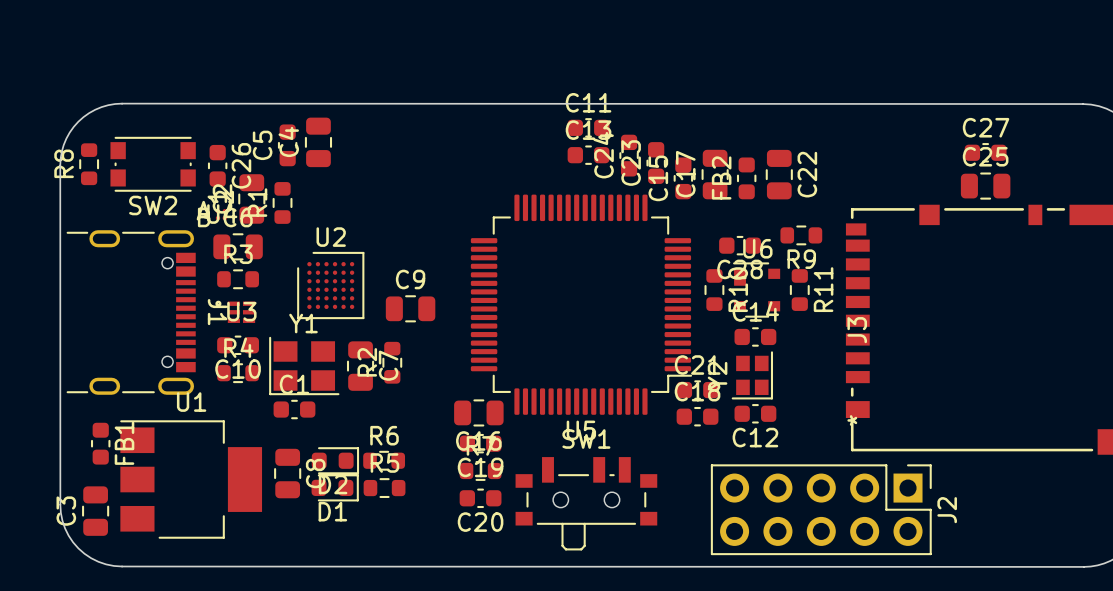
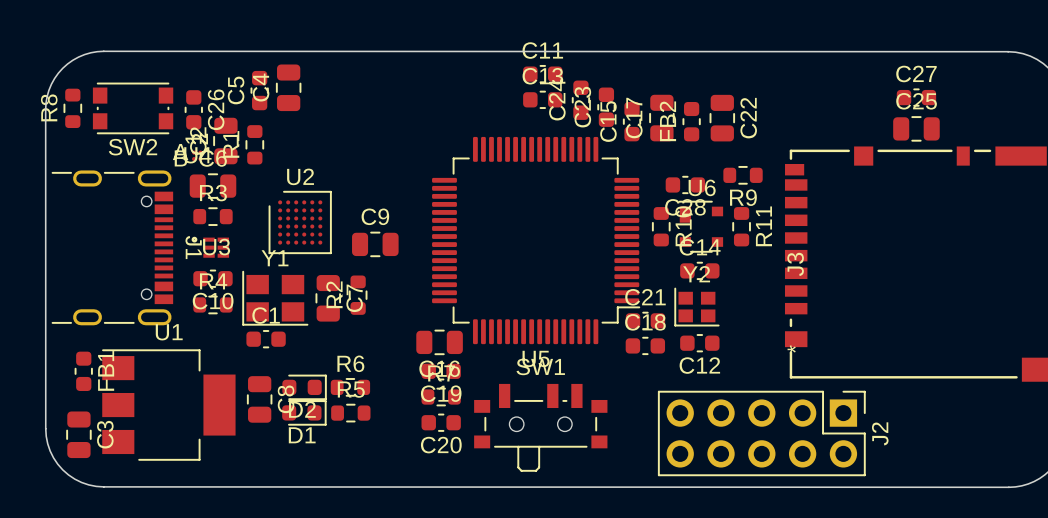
Y2 rotation: 0° (752, 375) -> 90° clockwise (696, 307)
C3 name position: C3 (66, 511) -> C3 (105, 434)

